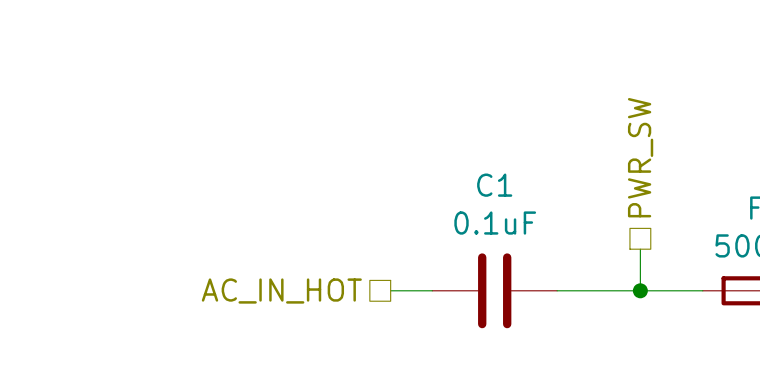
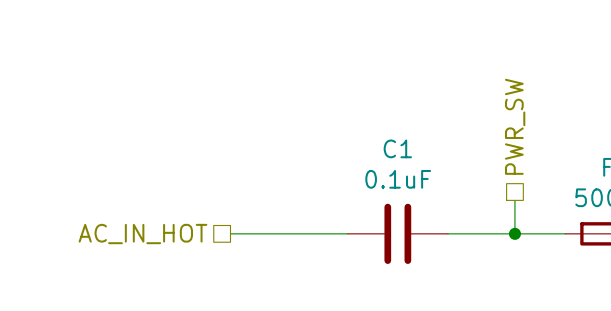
wire: none -> (230, 233) (314, 233)
hierarchical label position: AC_IN_HOT (281, 291) -> AC_IN_HOT (142, 234)

